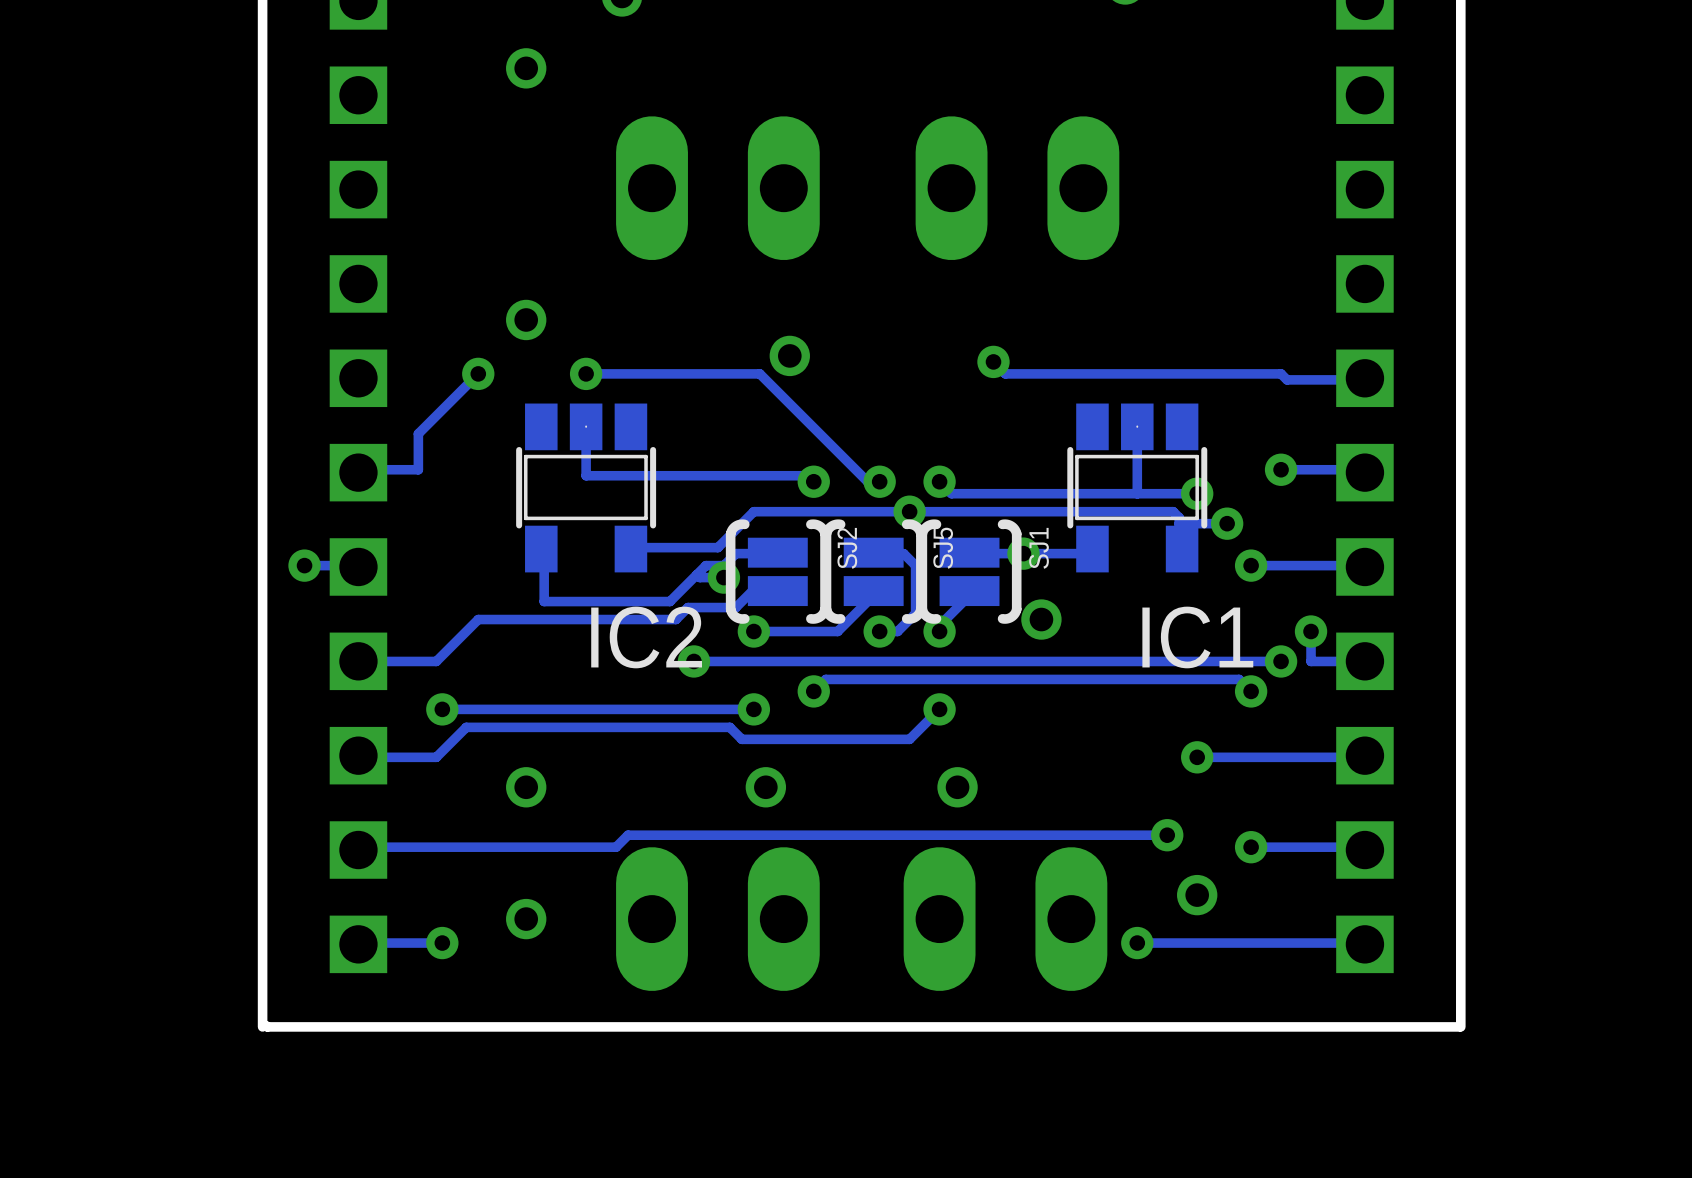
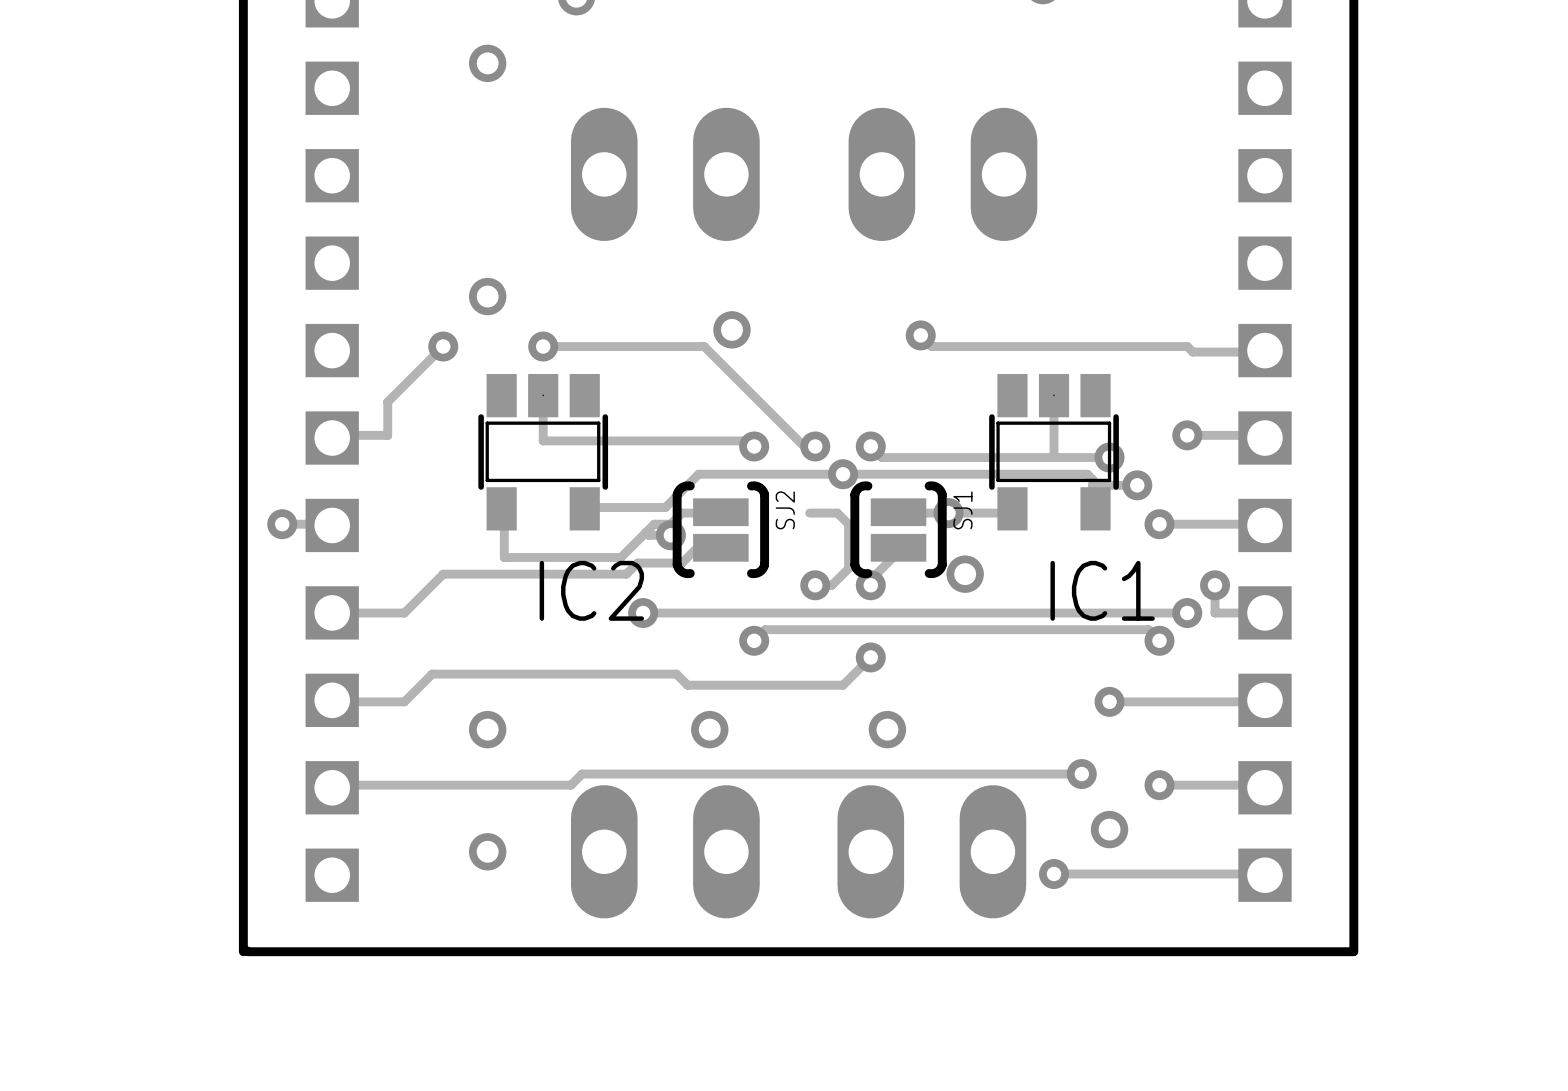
SJ5: (873, 571) -> none
track: (873, 591) (873, 595) (837, 631) (753, 631) -> none
via: (753, 631) -> none
via: (442, 709) -> none
track: (753, 709) (442, 709) -> none
via: (753, 709) -> none
track: (442, 943) (358, 944) -> none
via: (442, 943) -> none

